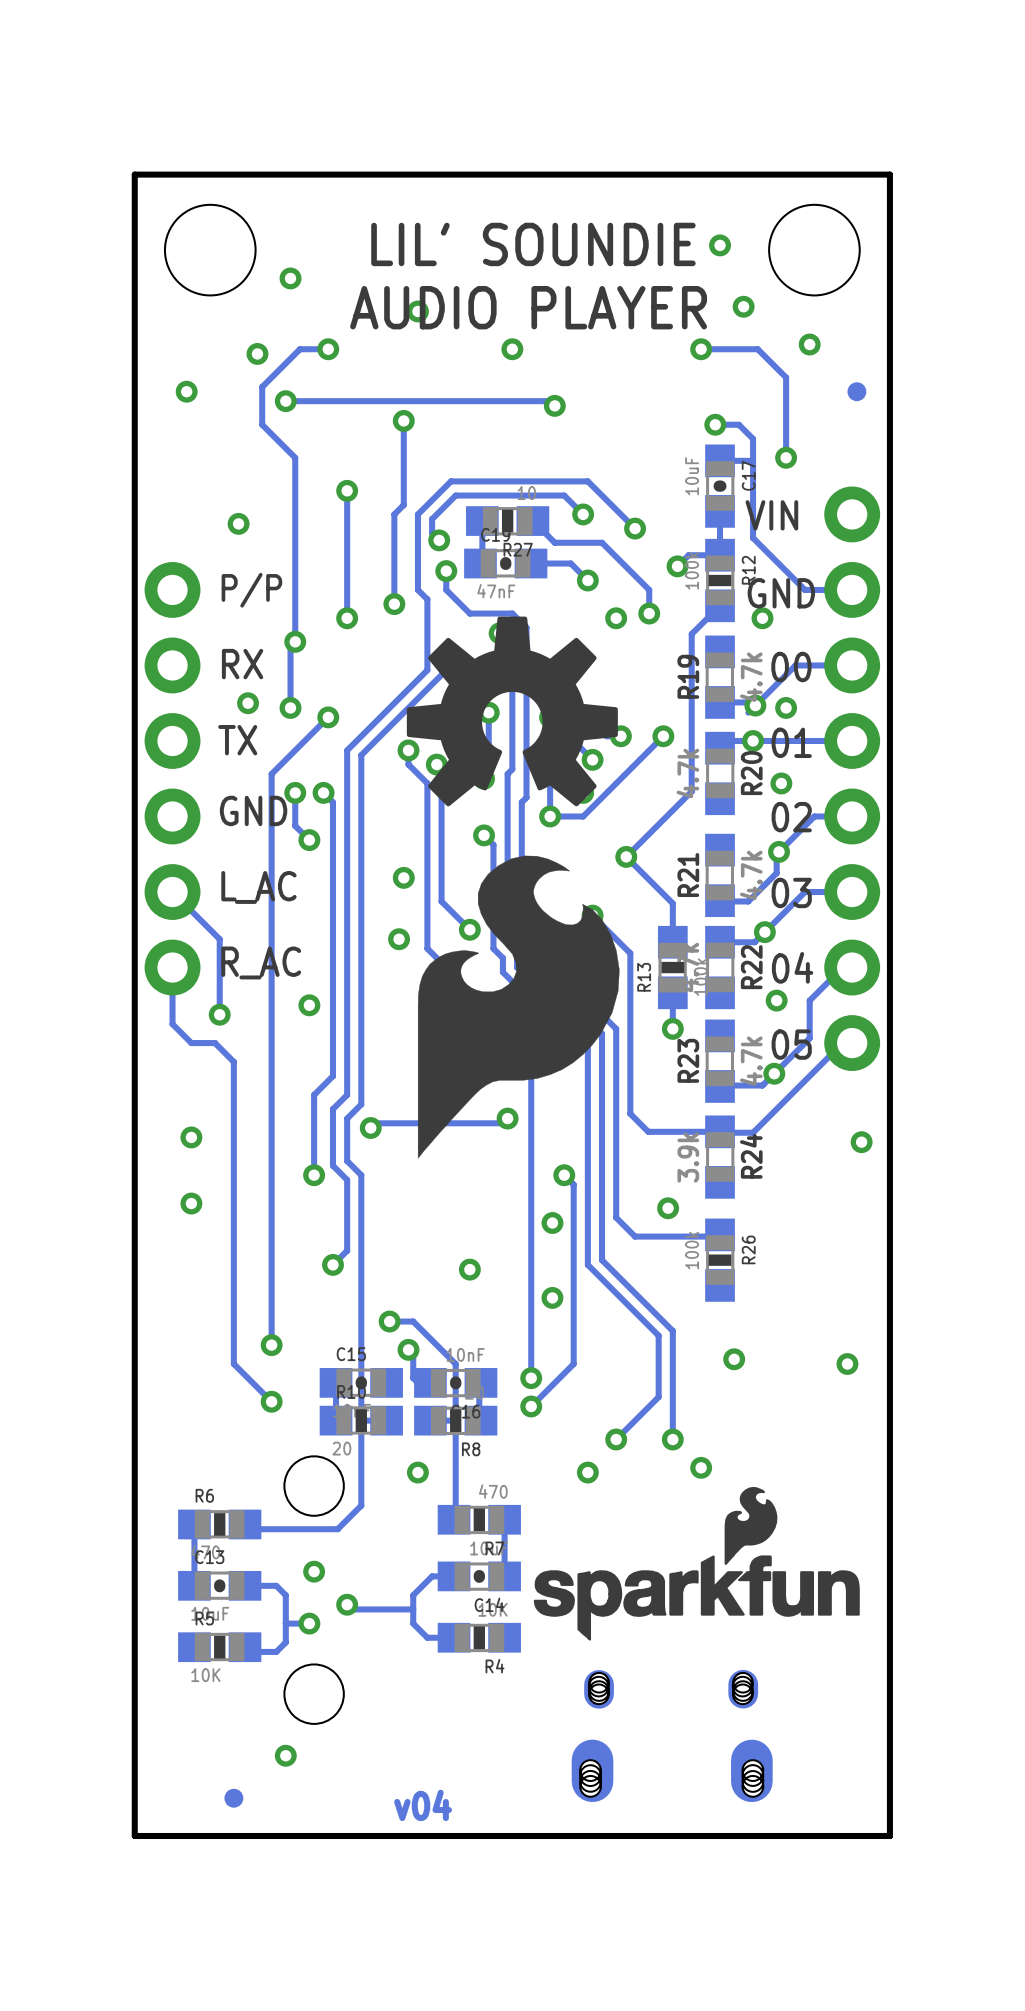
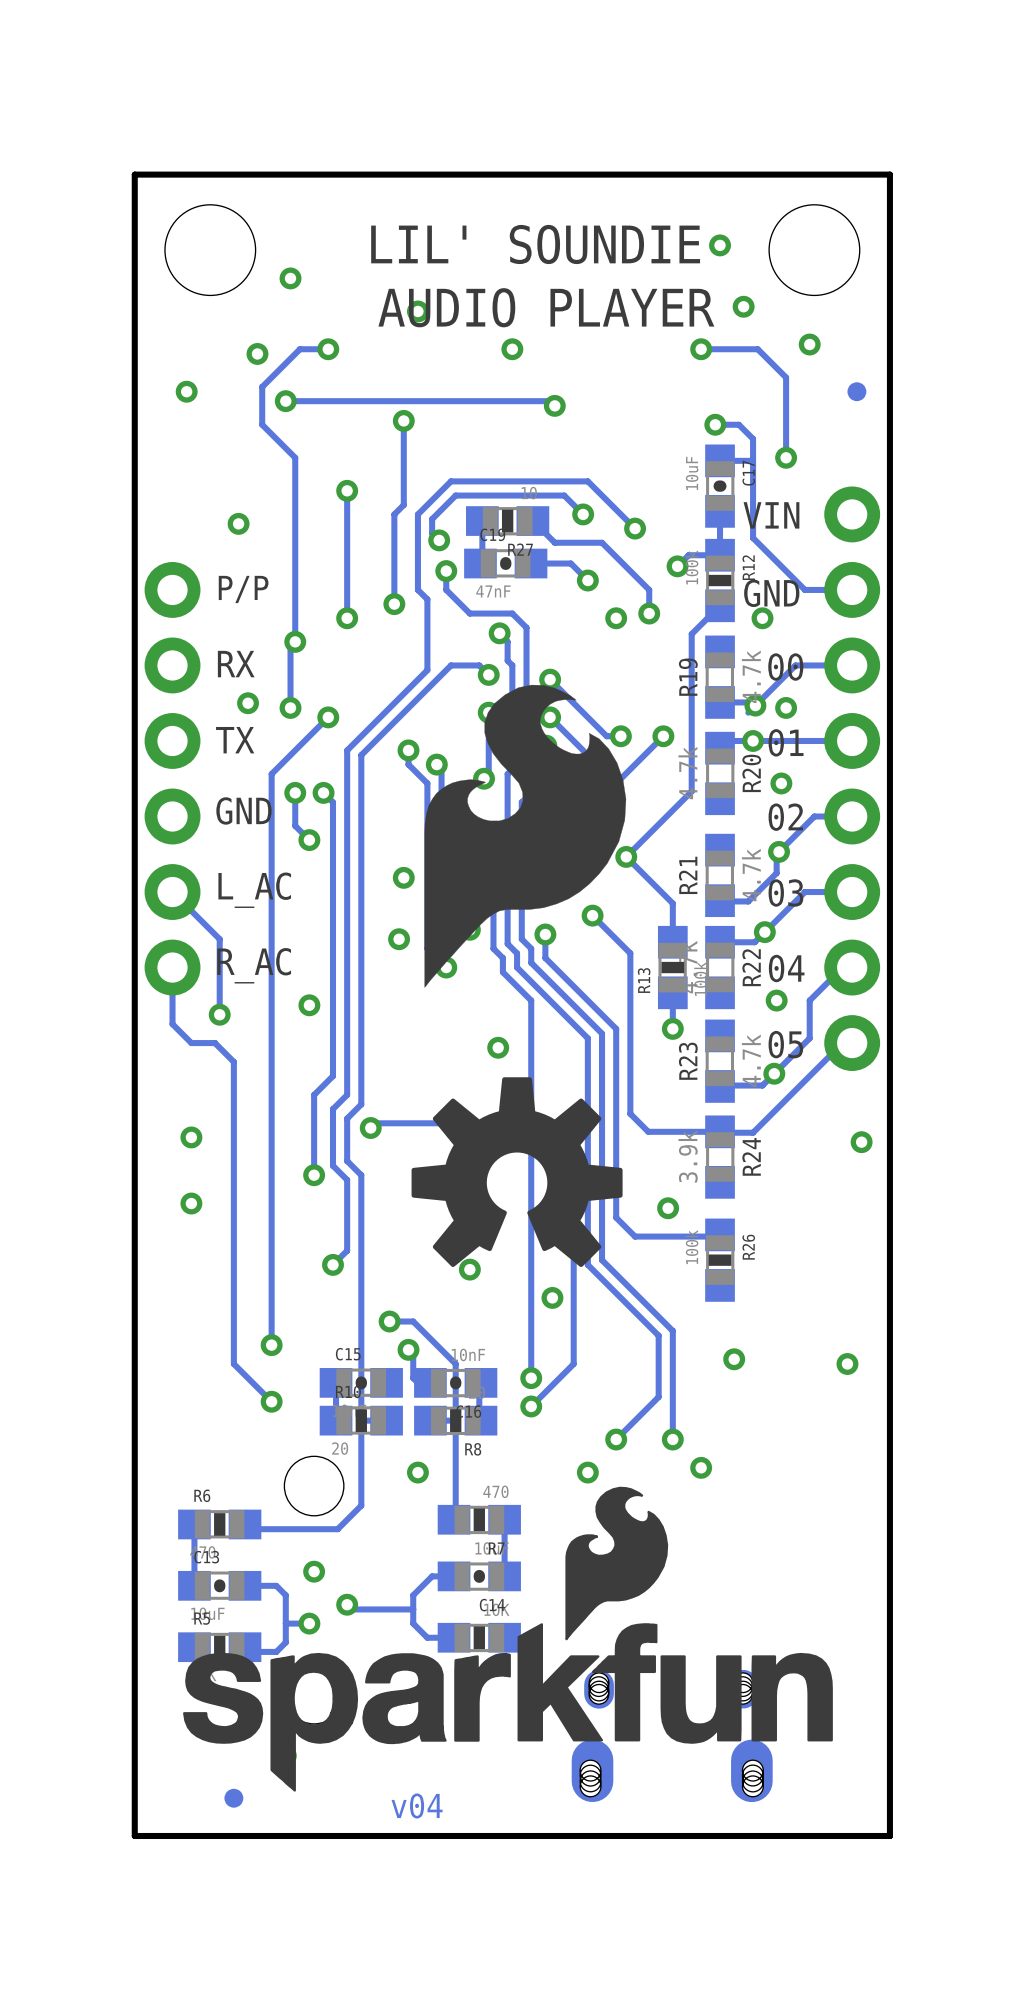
drawing position: (512, 711) -> (517, 1172)
drawing position: (518, 1007) -> (525, 836)
drawing: none -> [183, 1486, 833, 1792]
drawing: [533, 1487, 860, 1641] -> none

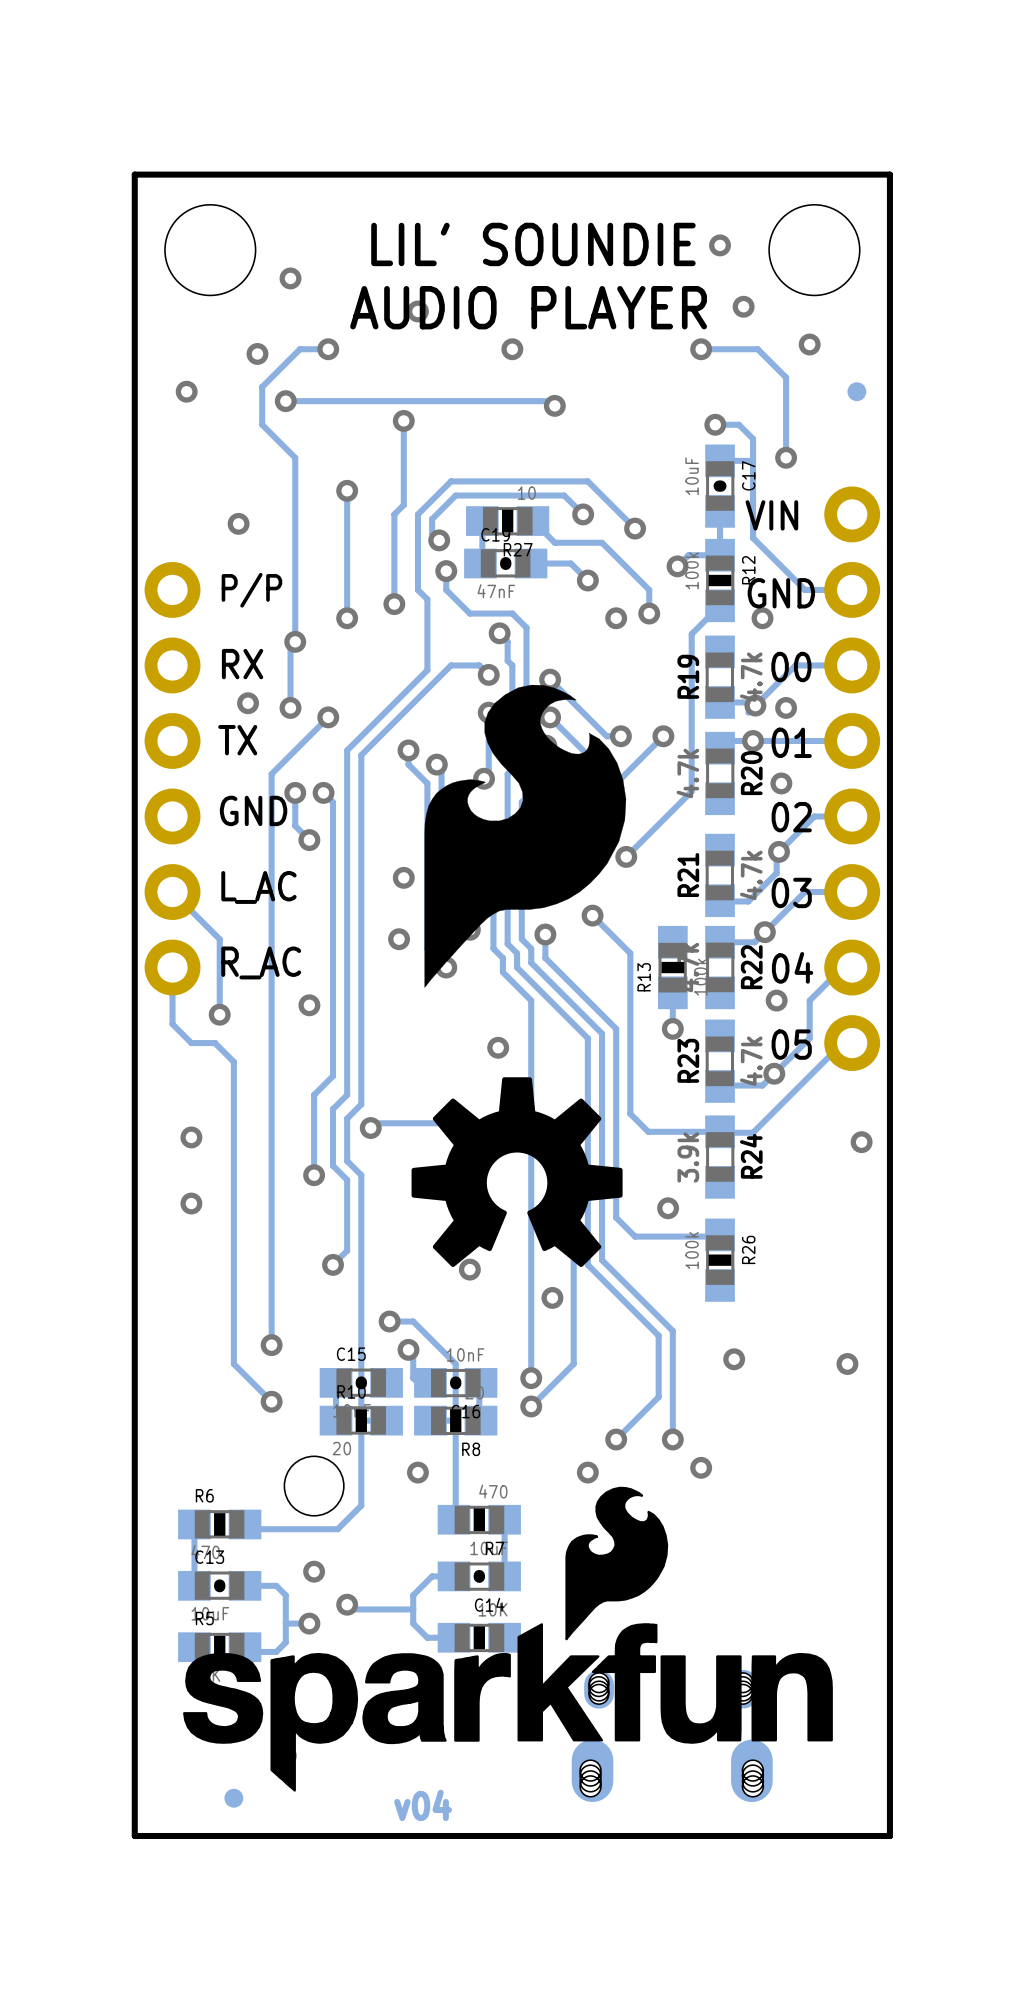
track: (626, 856) (672, 903) (672, 942) -> none

